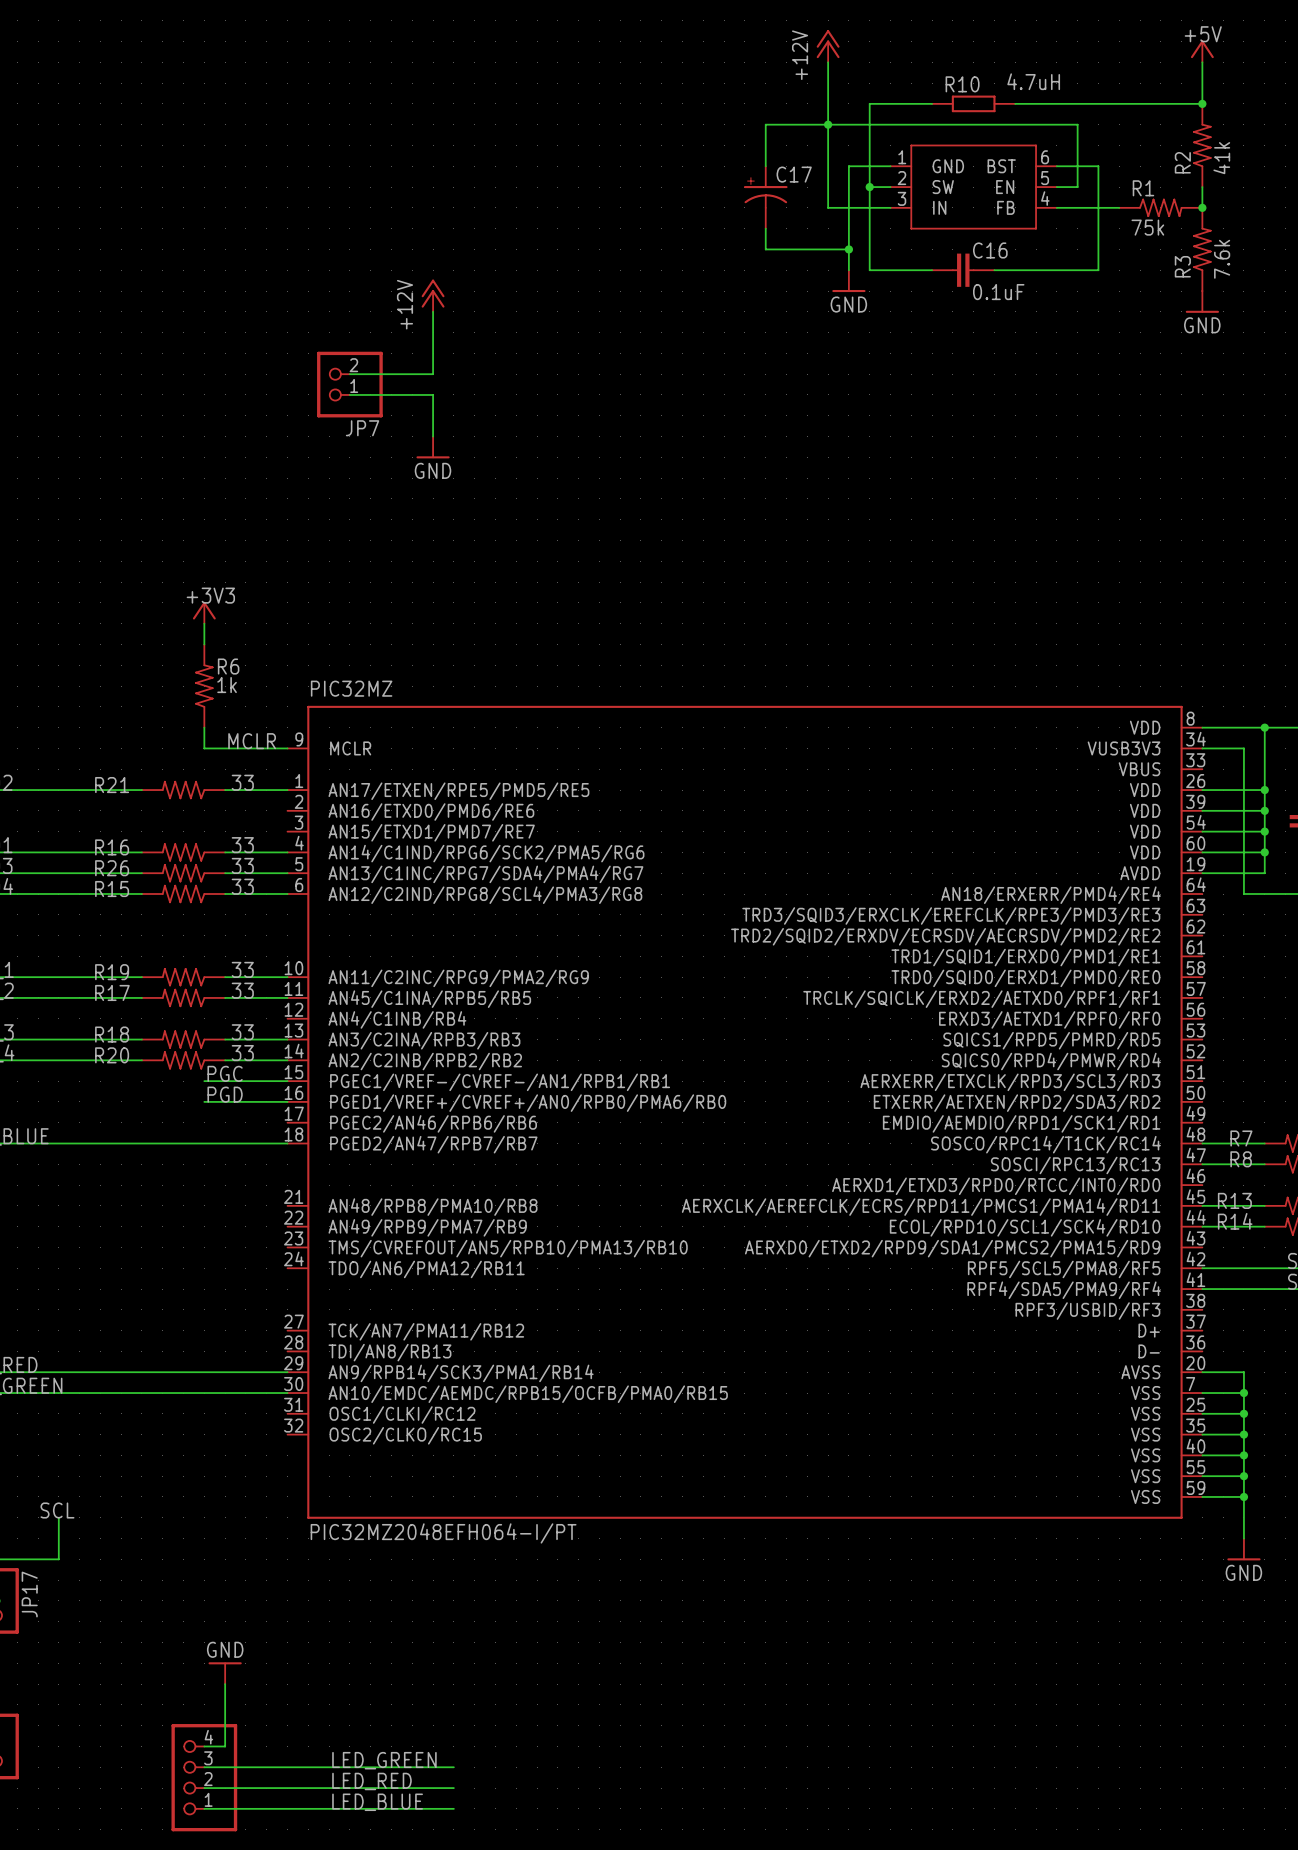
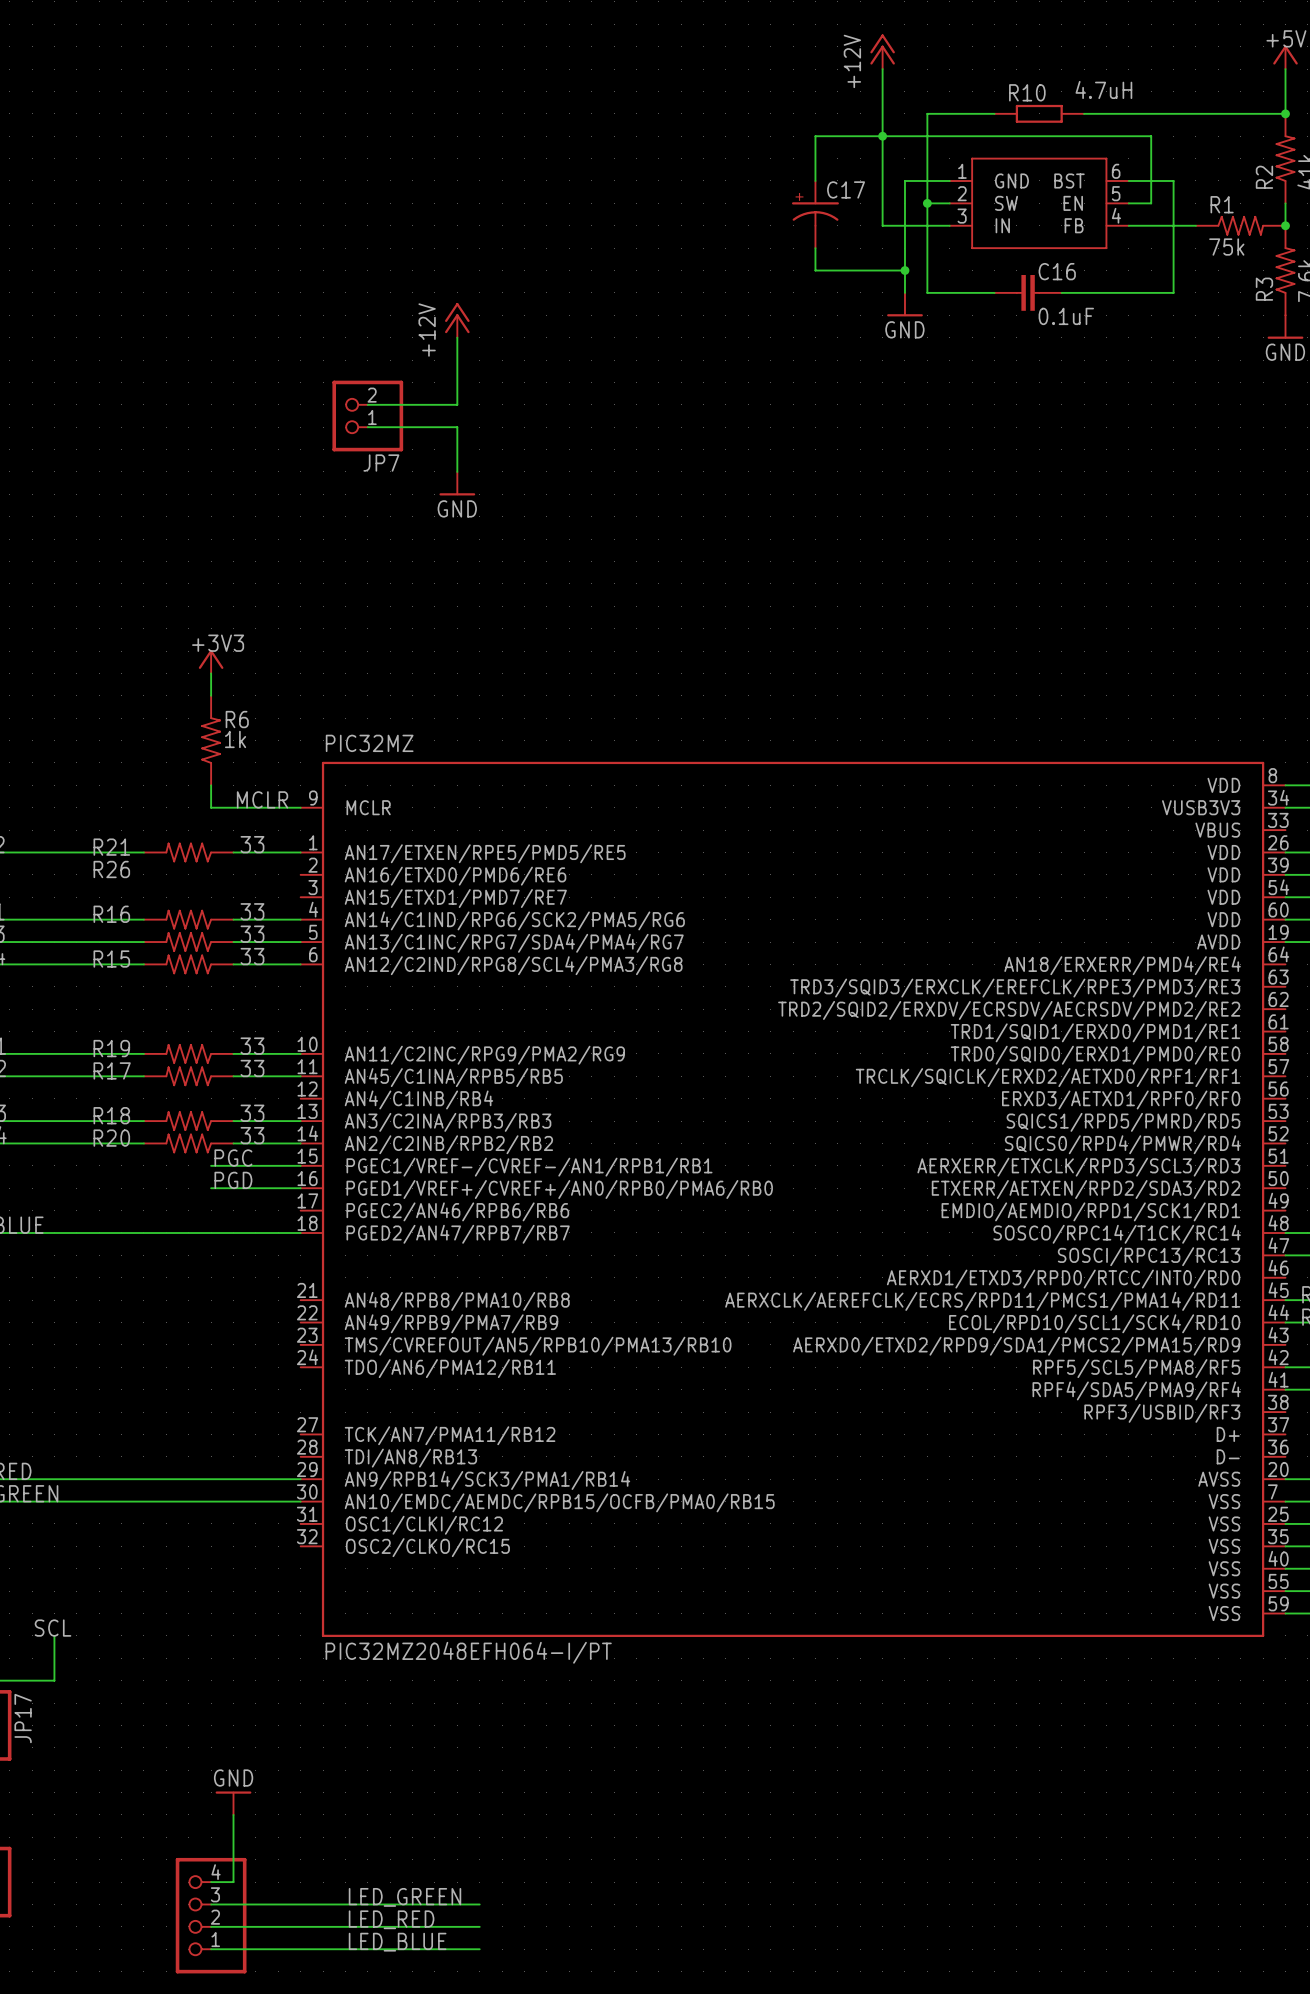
R26 name position: R26 (112, 868) -> R26 (111, 869)

